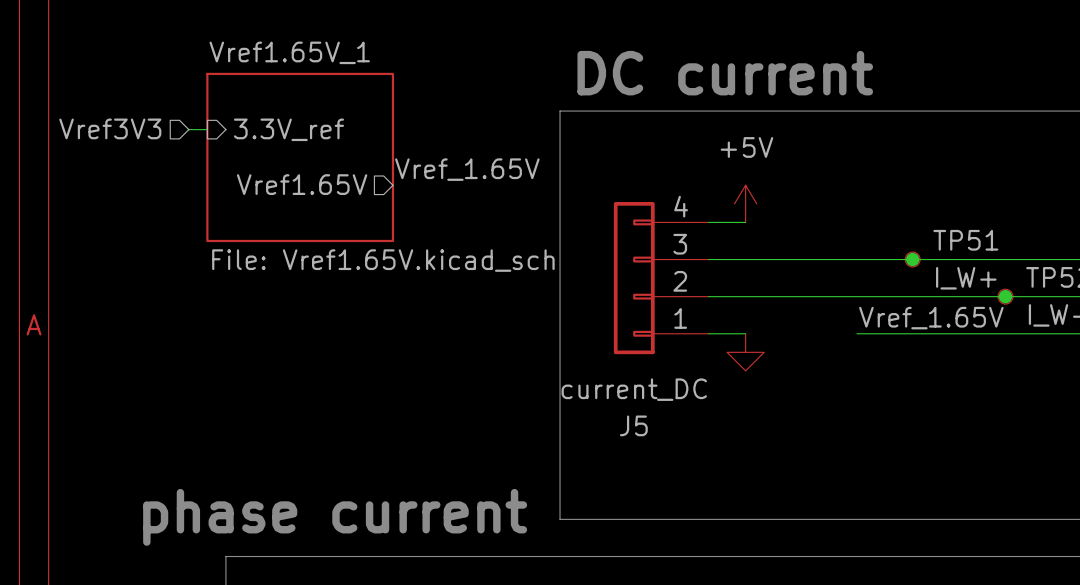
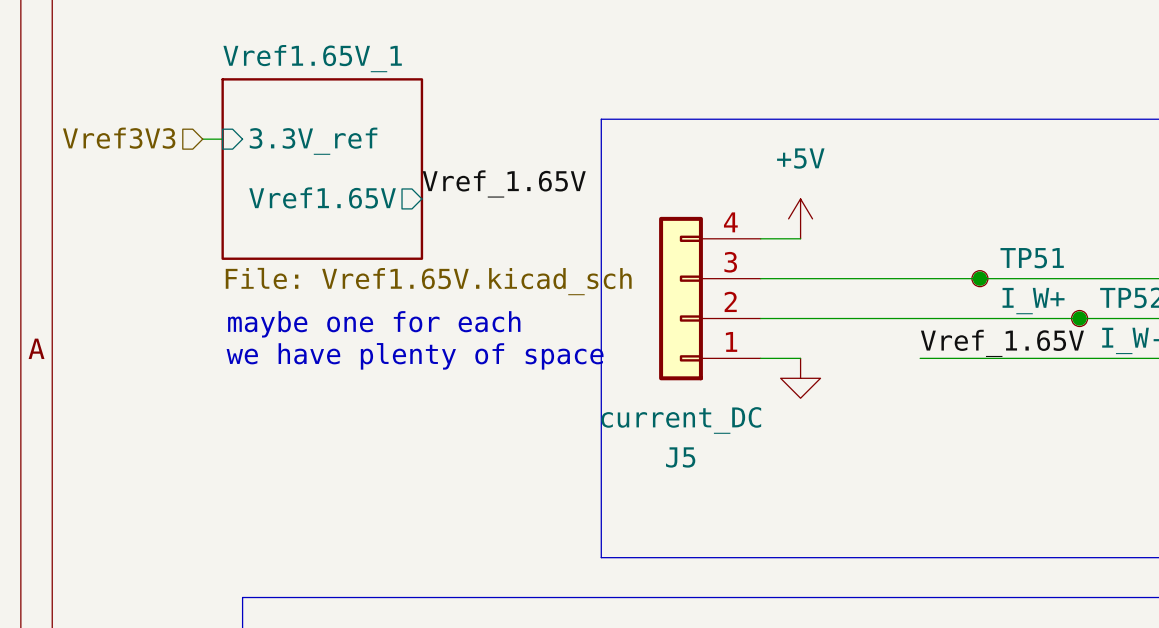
text: DC current (725, 73) -> none
text: none -> maybe one for each (374, 324)
text: none -> we have plenty of space (415, 356)
text: phase current (335, 517) -> none

